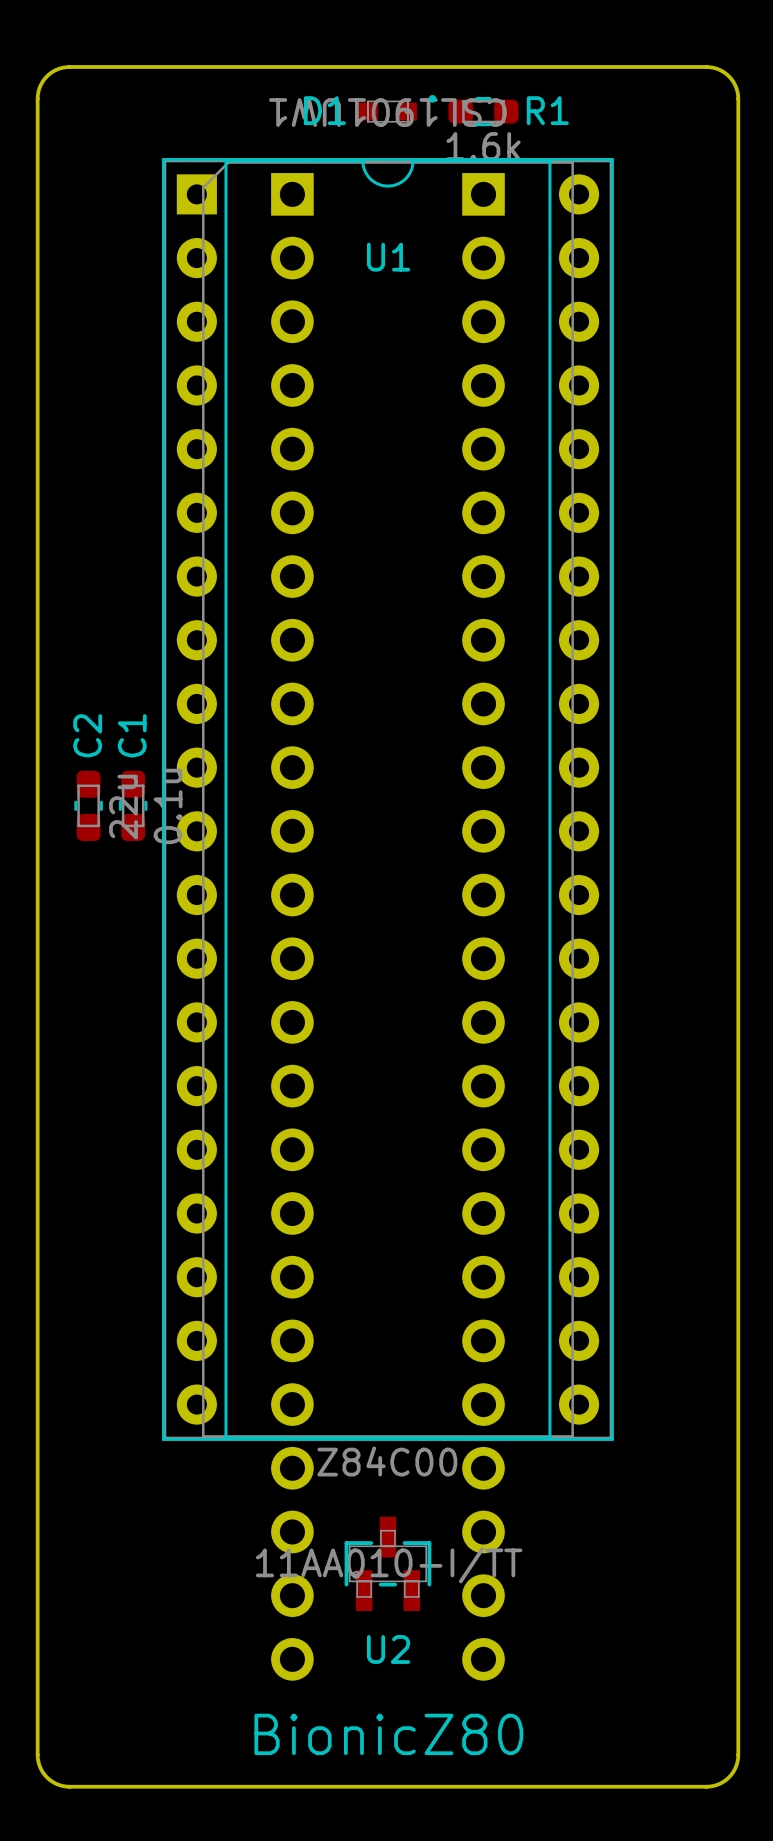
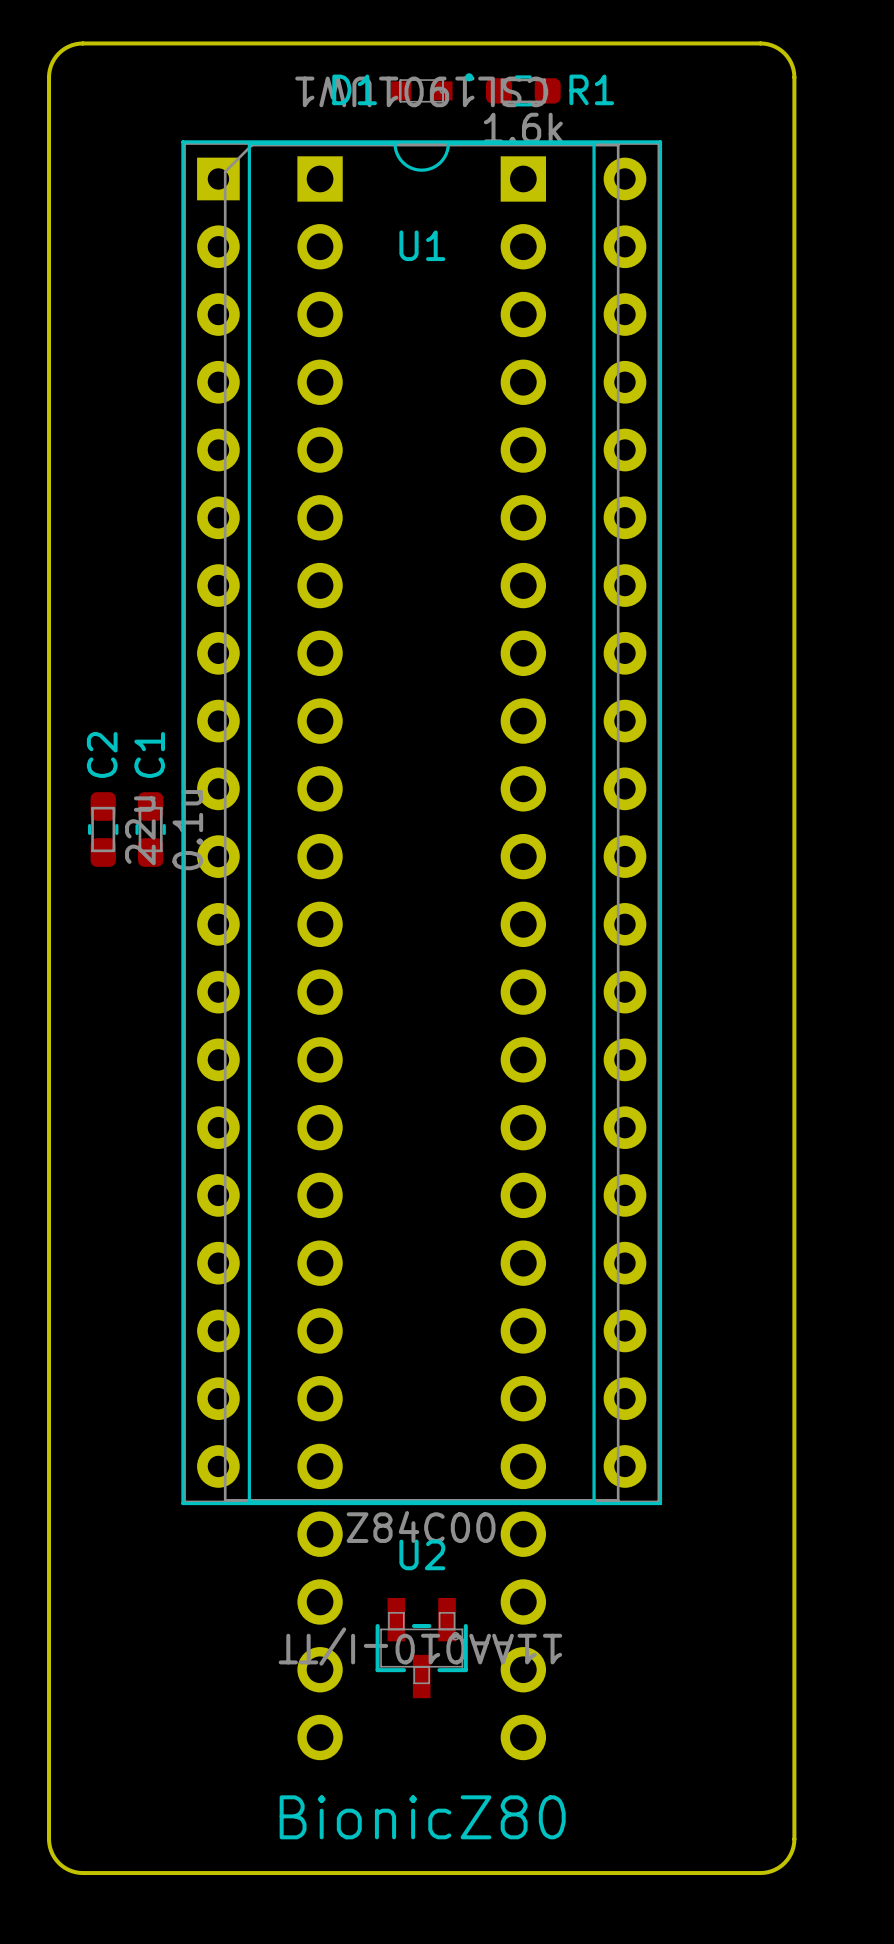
U2 rotation: 0° (387, 1563) -> 180° (421, 1648)

